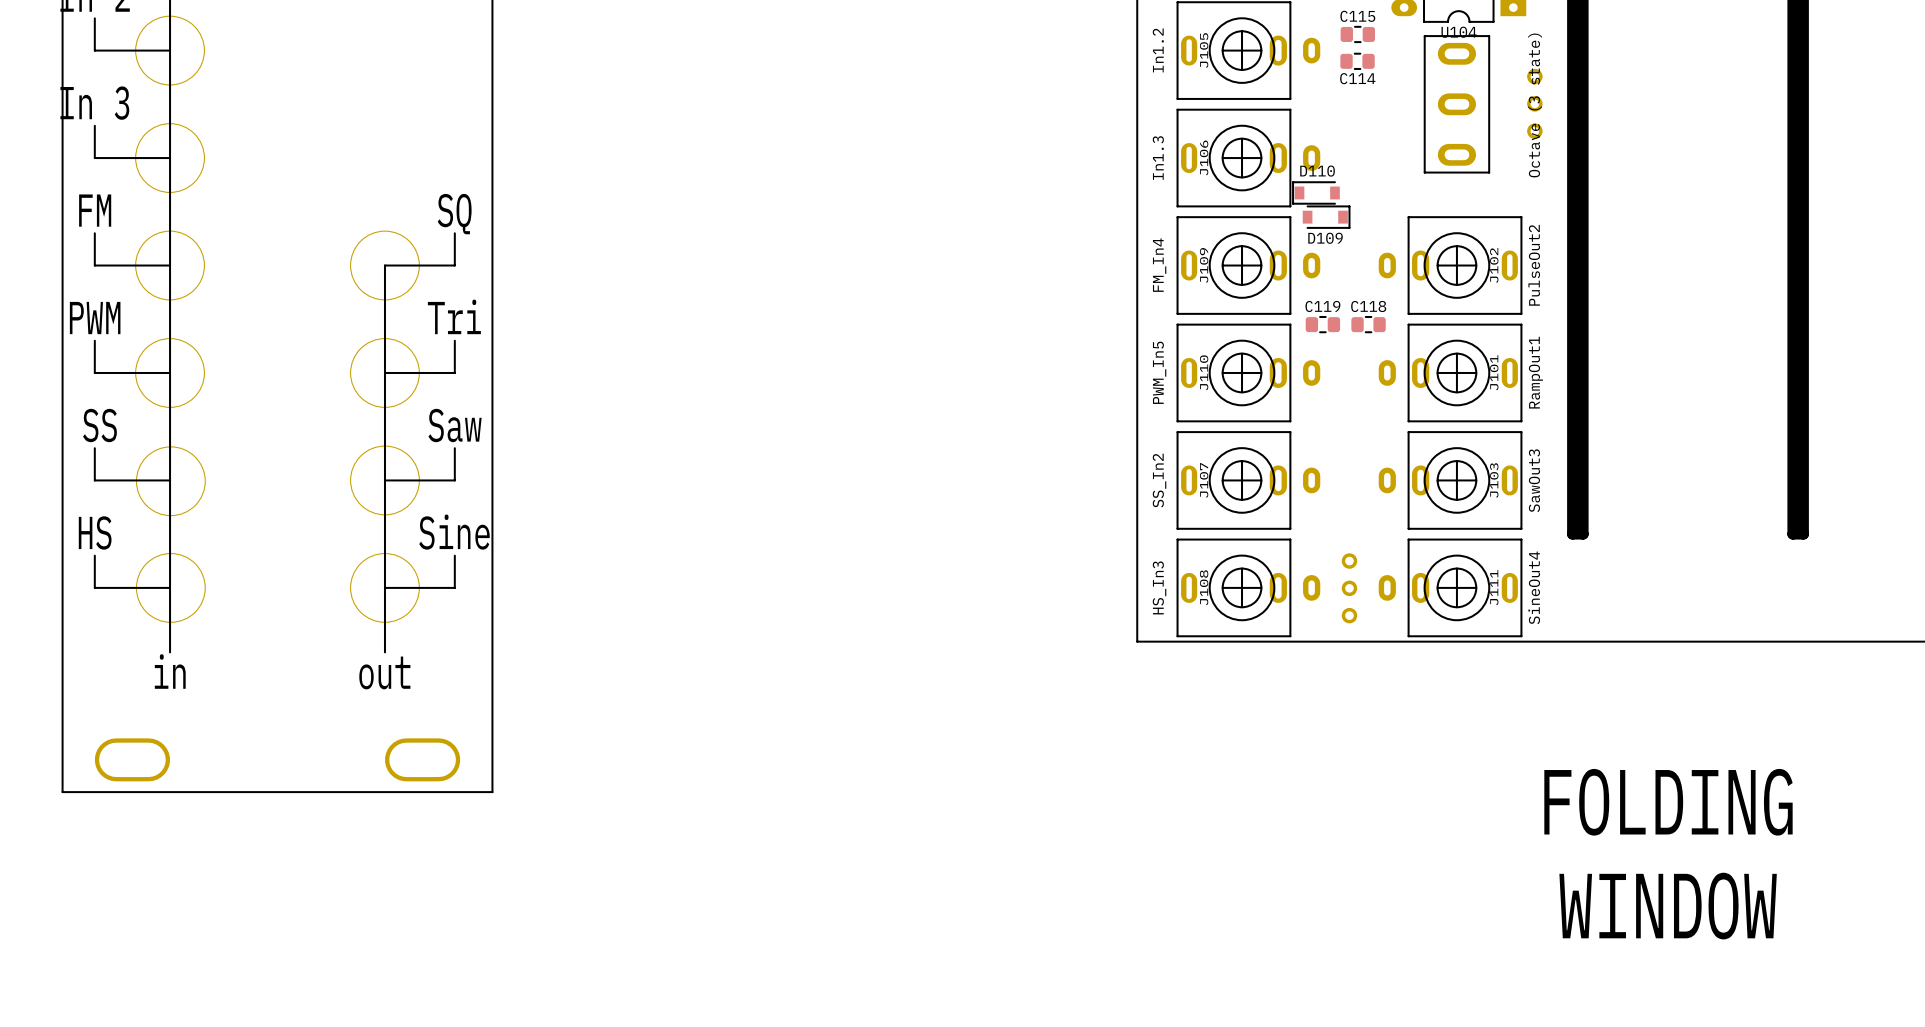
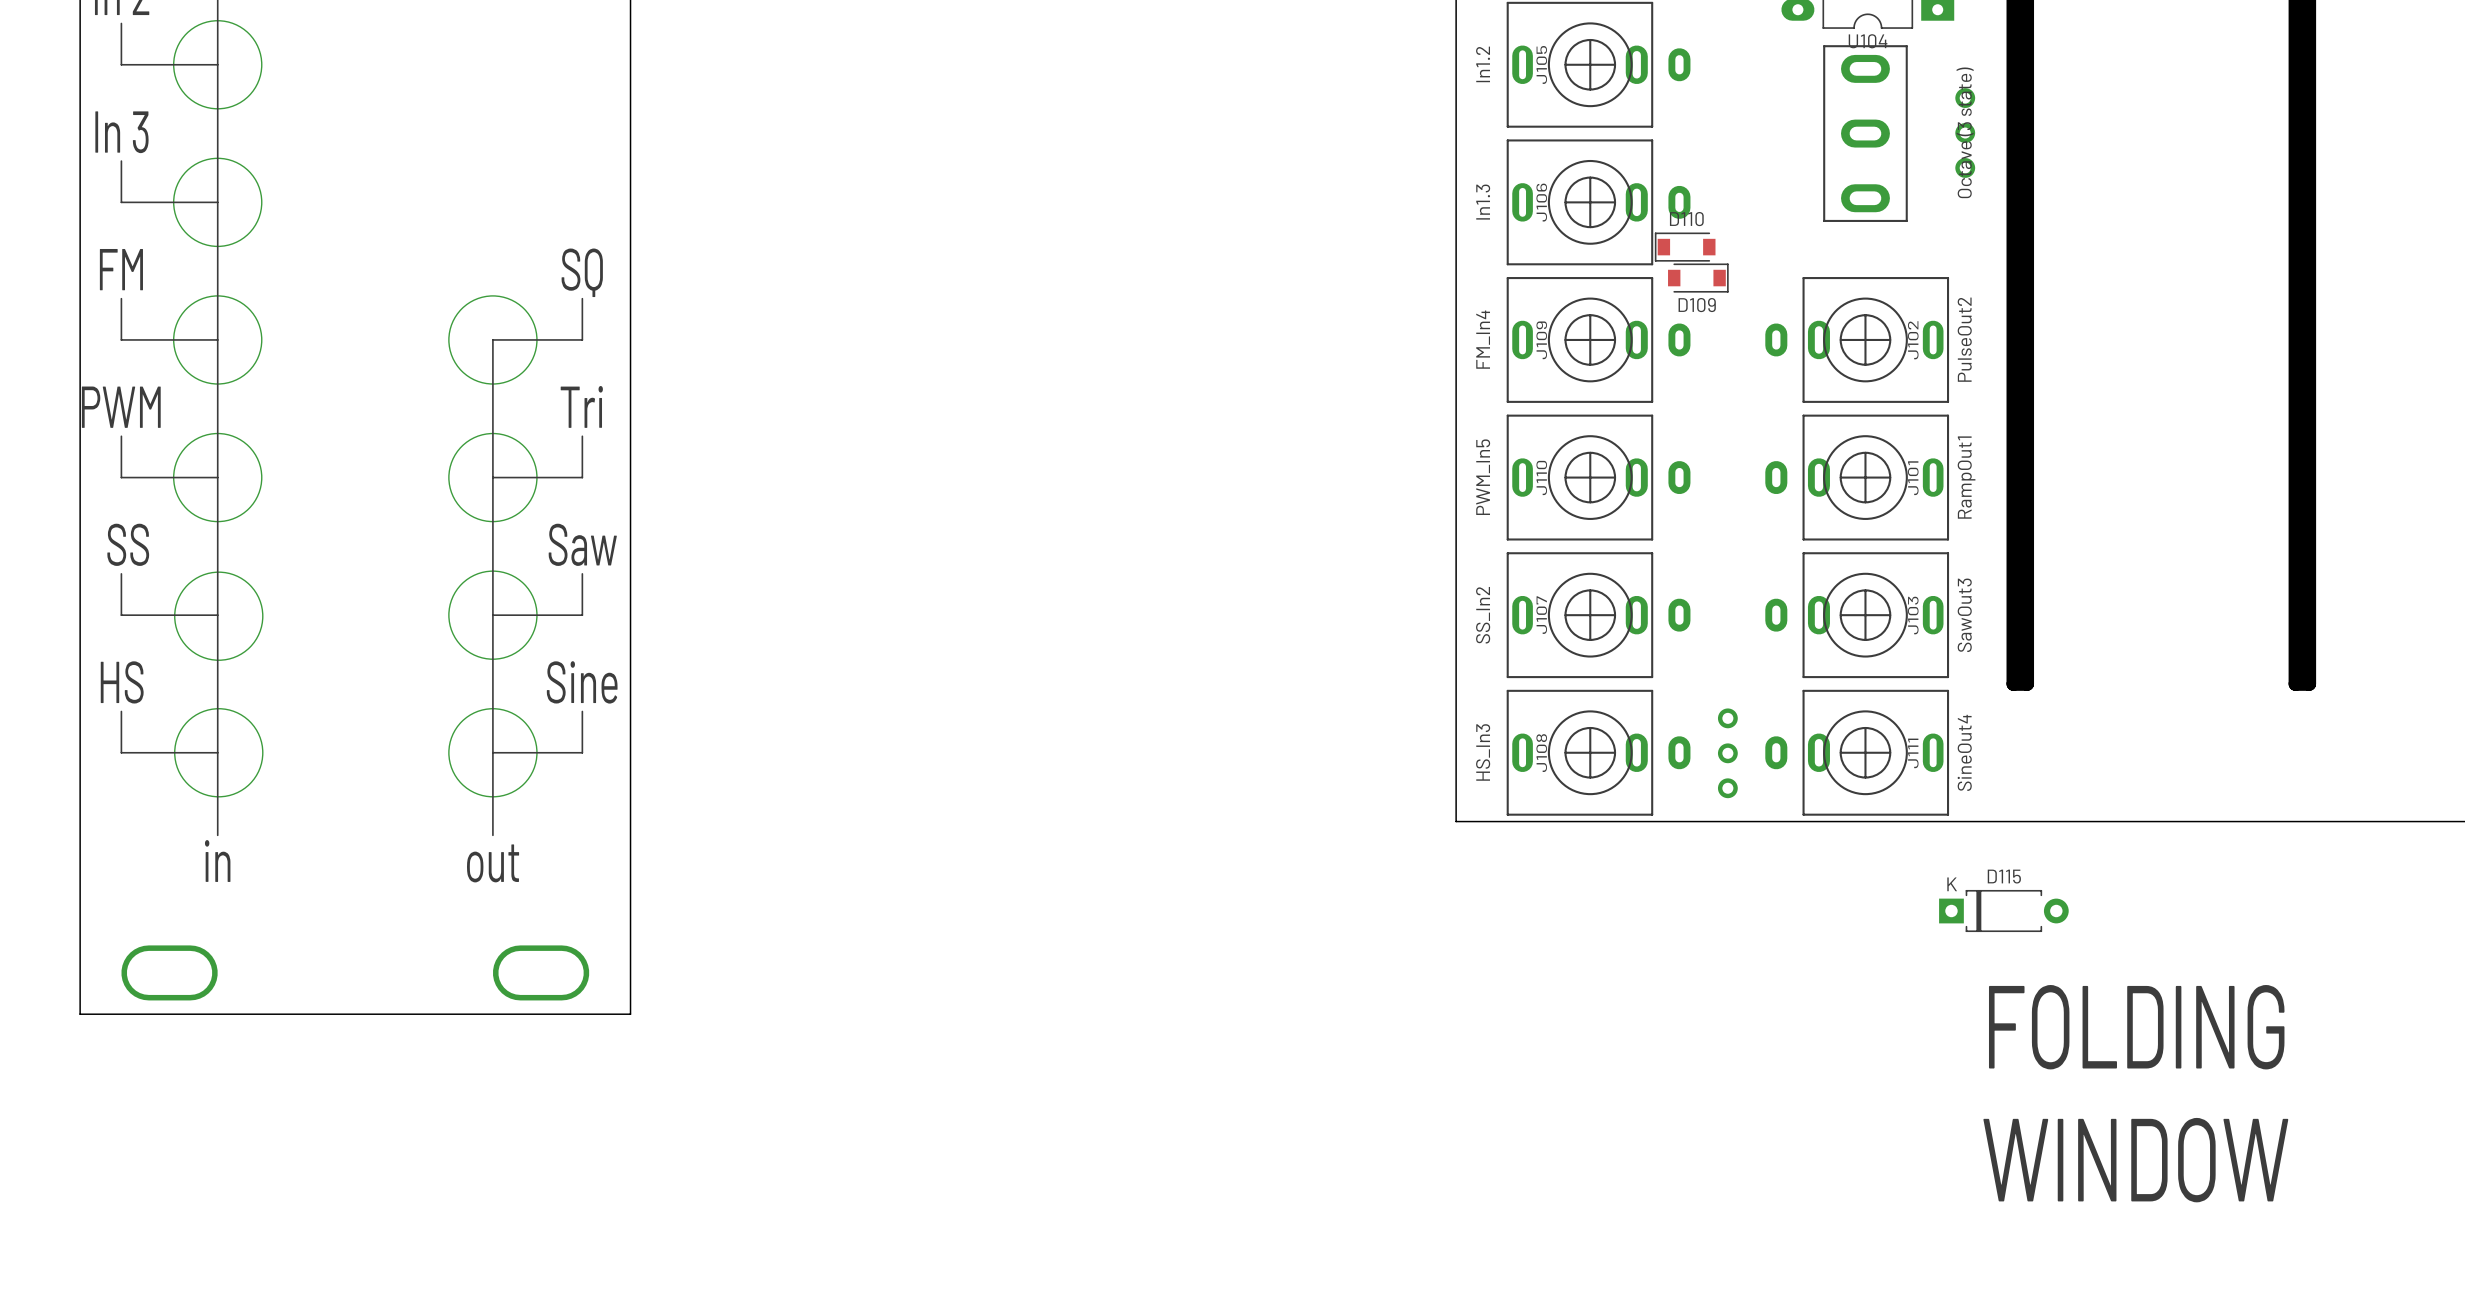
C115: (1357, 34) -> none
C114: (1357, 61) -> none
C119: (1322, 324) -> none
C118: (1368, 324) -> none
D115: none -> (2003, 911)

